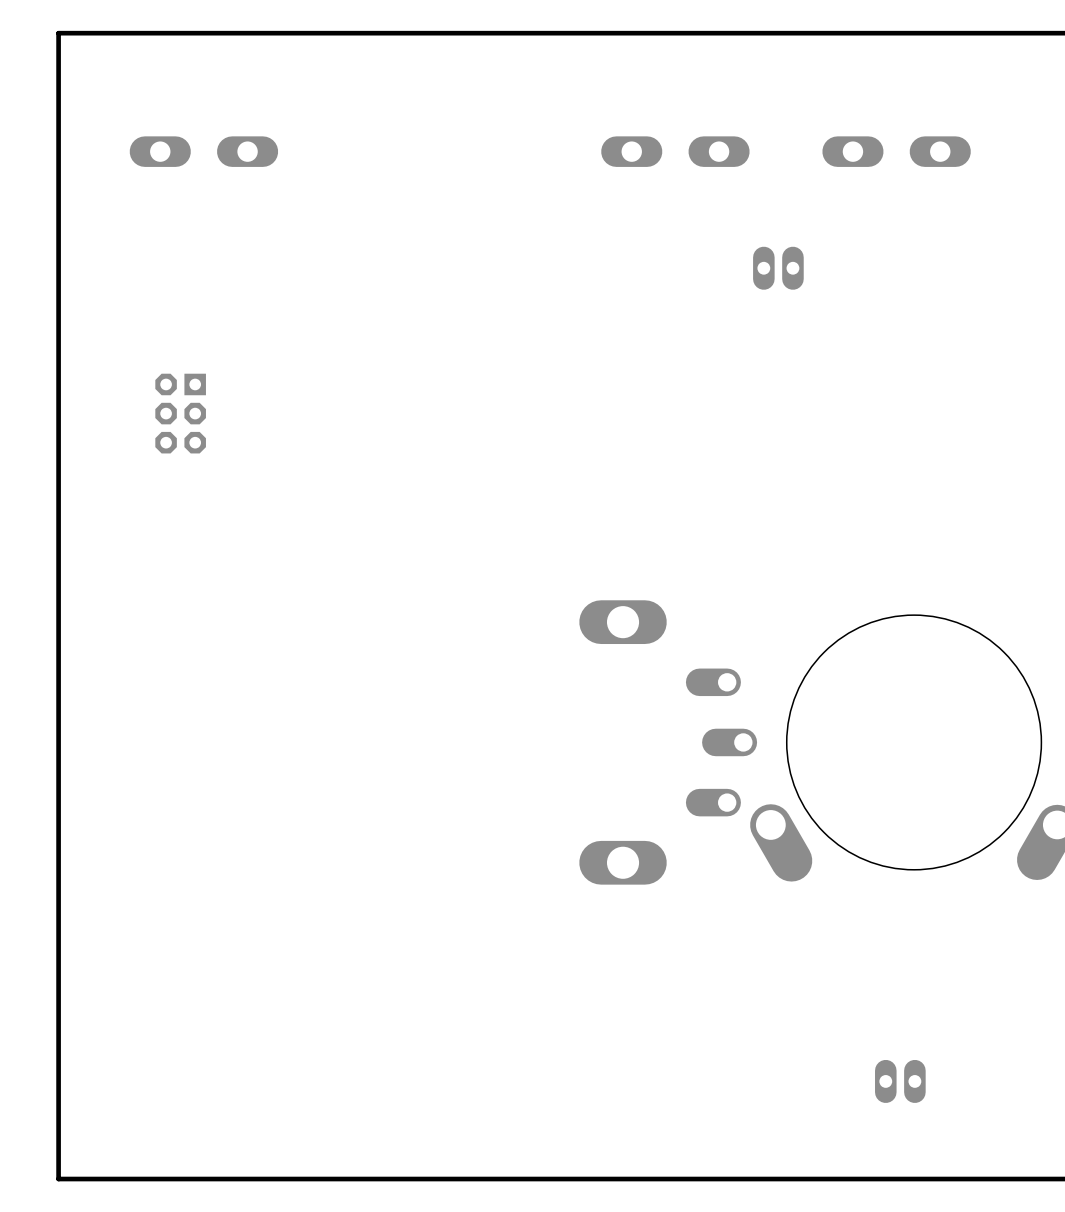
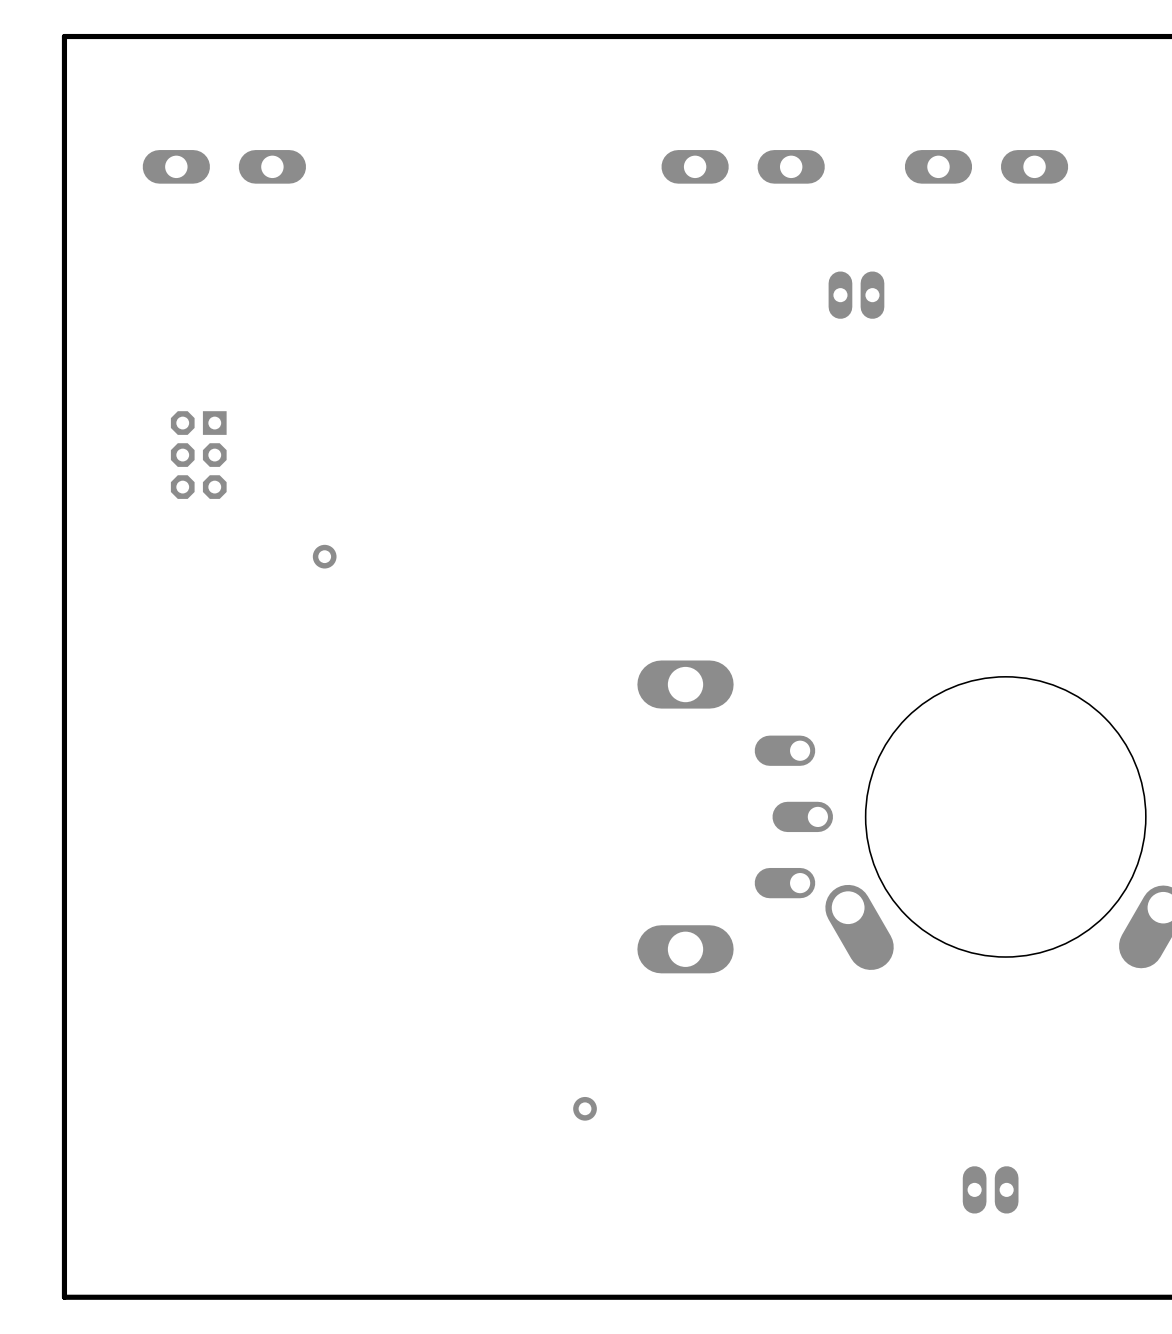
part: none -> (324, 556)
part: none -> (585, 1108)

